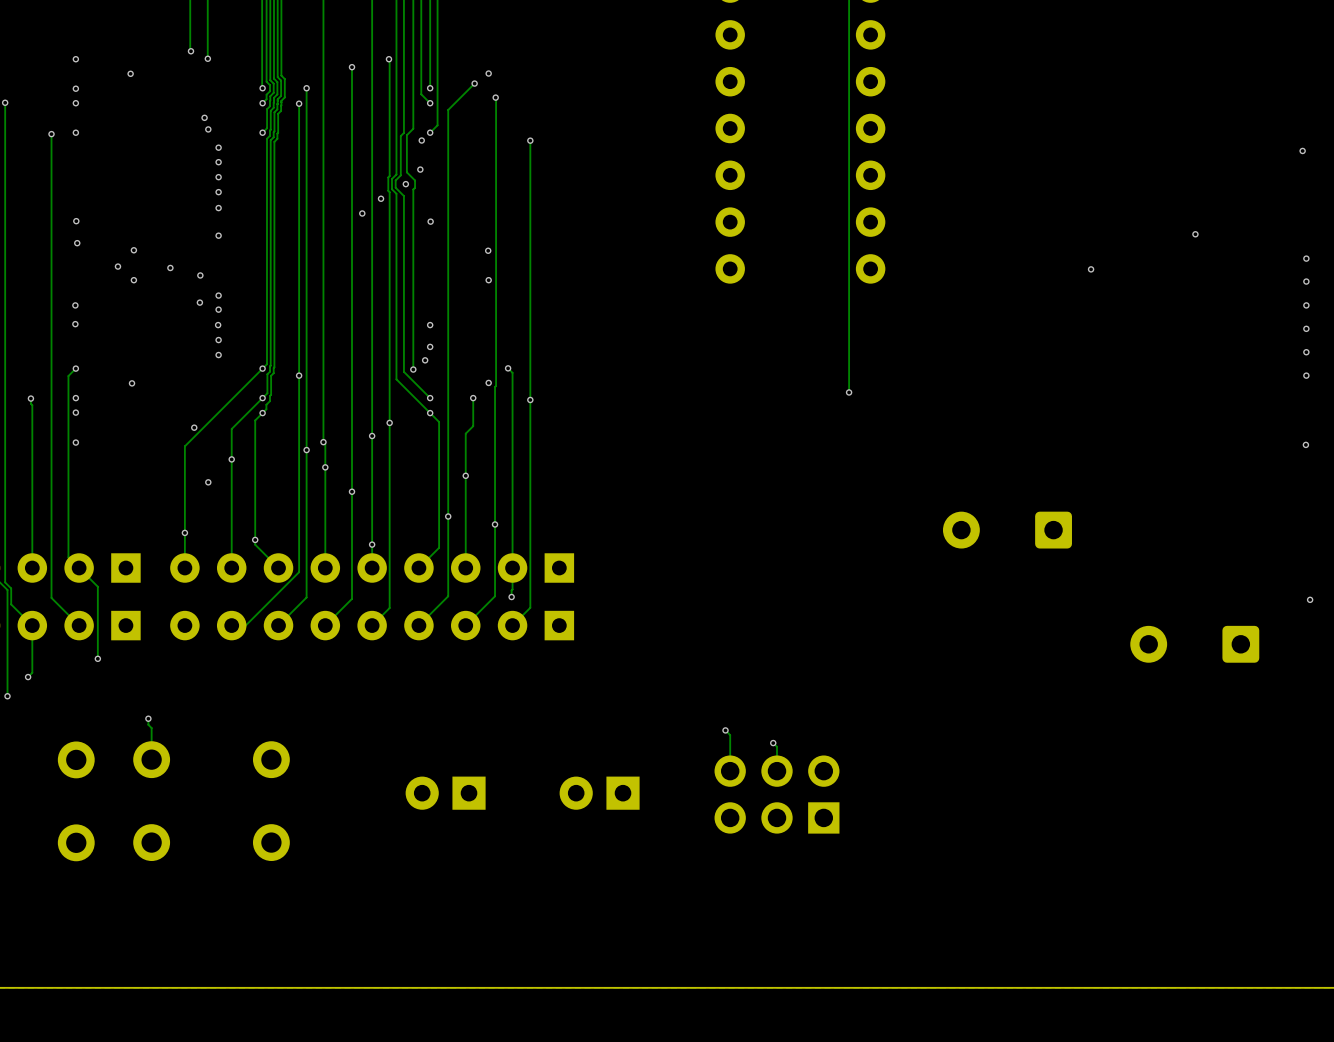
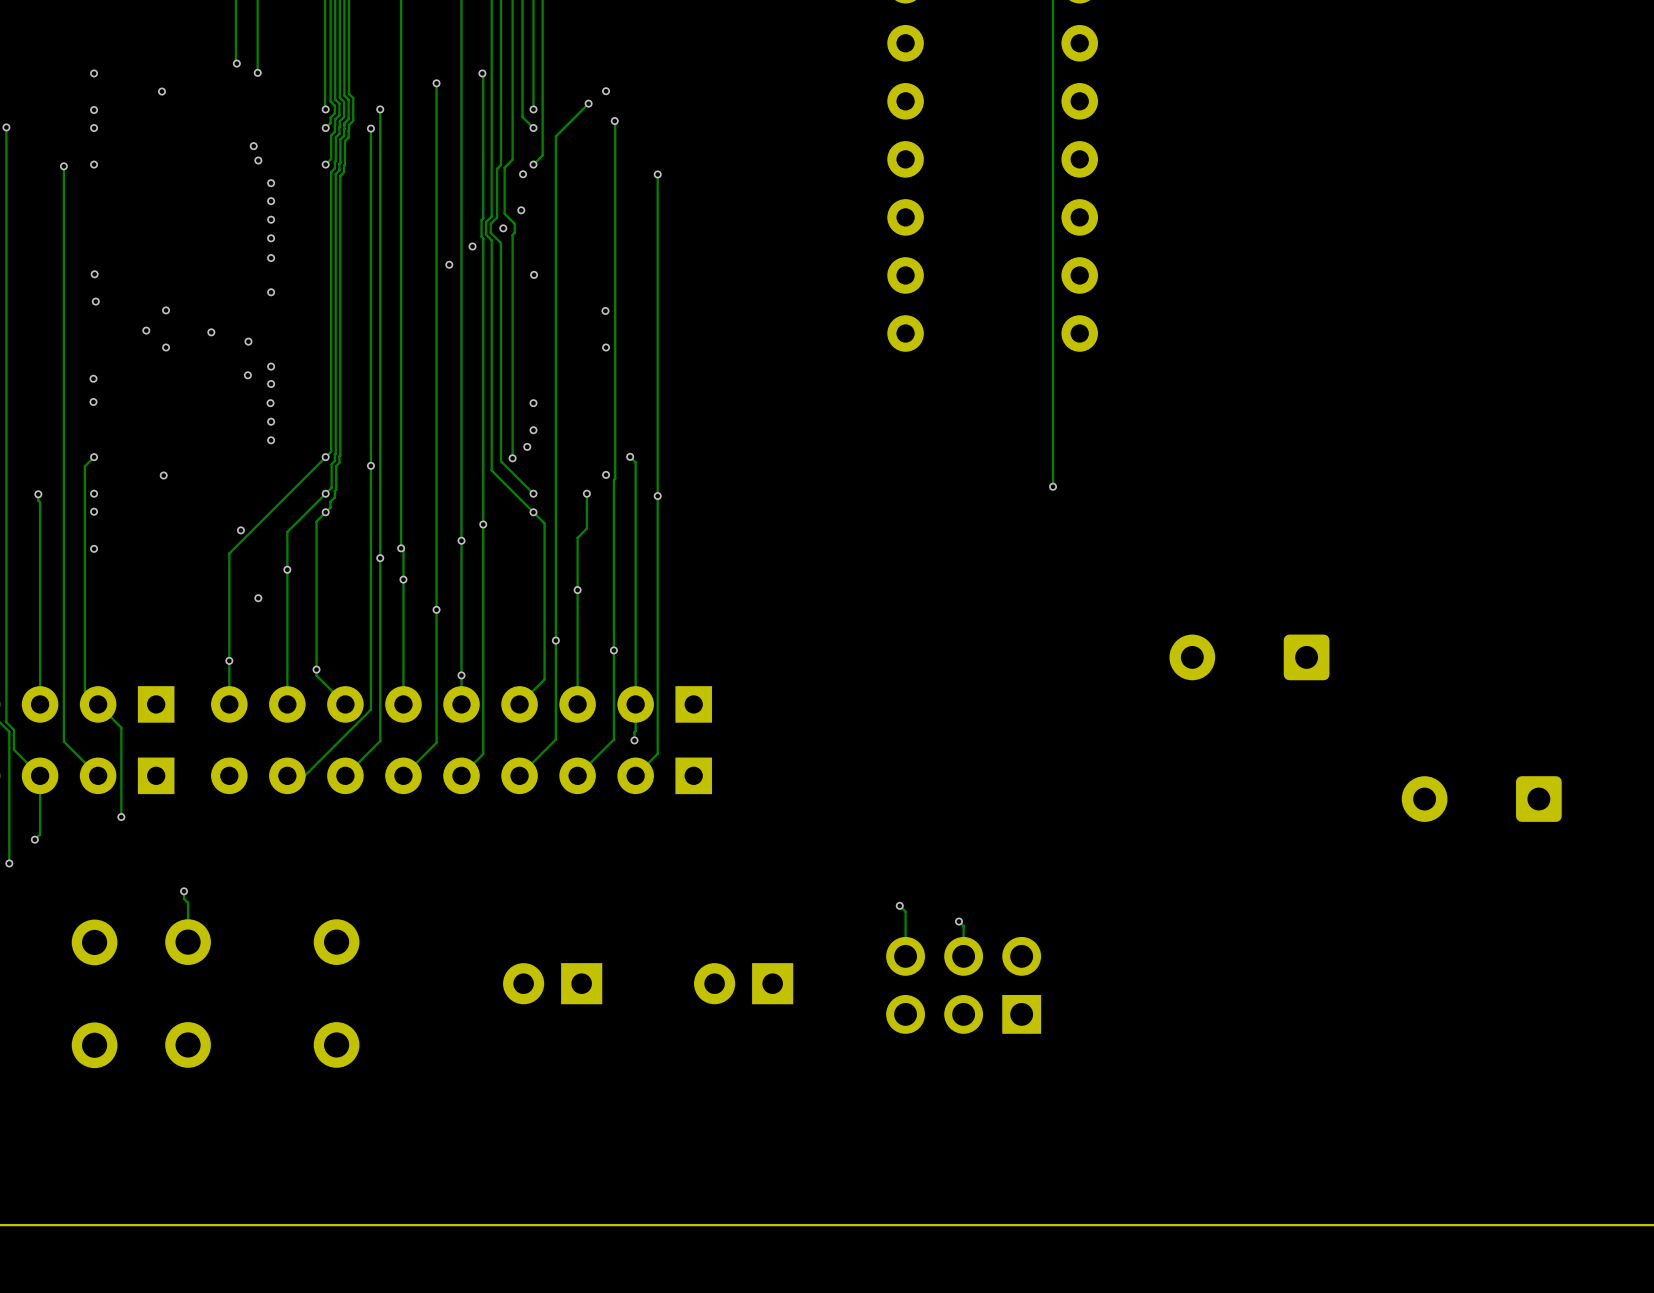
via: (1302, 150) -> none
via: (1195, 234) -> none
via: (1306, 258) -> none
via: (1091, 269) -> none
via: (1306, 281) -> none
via: (1306, 305) -> none
via: (1306, 328) -> none
via: (1306, 352) -> none
via: (1306, 375) -> none
via: (1305, 444) -> none
via: (1310, 599) -> none

